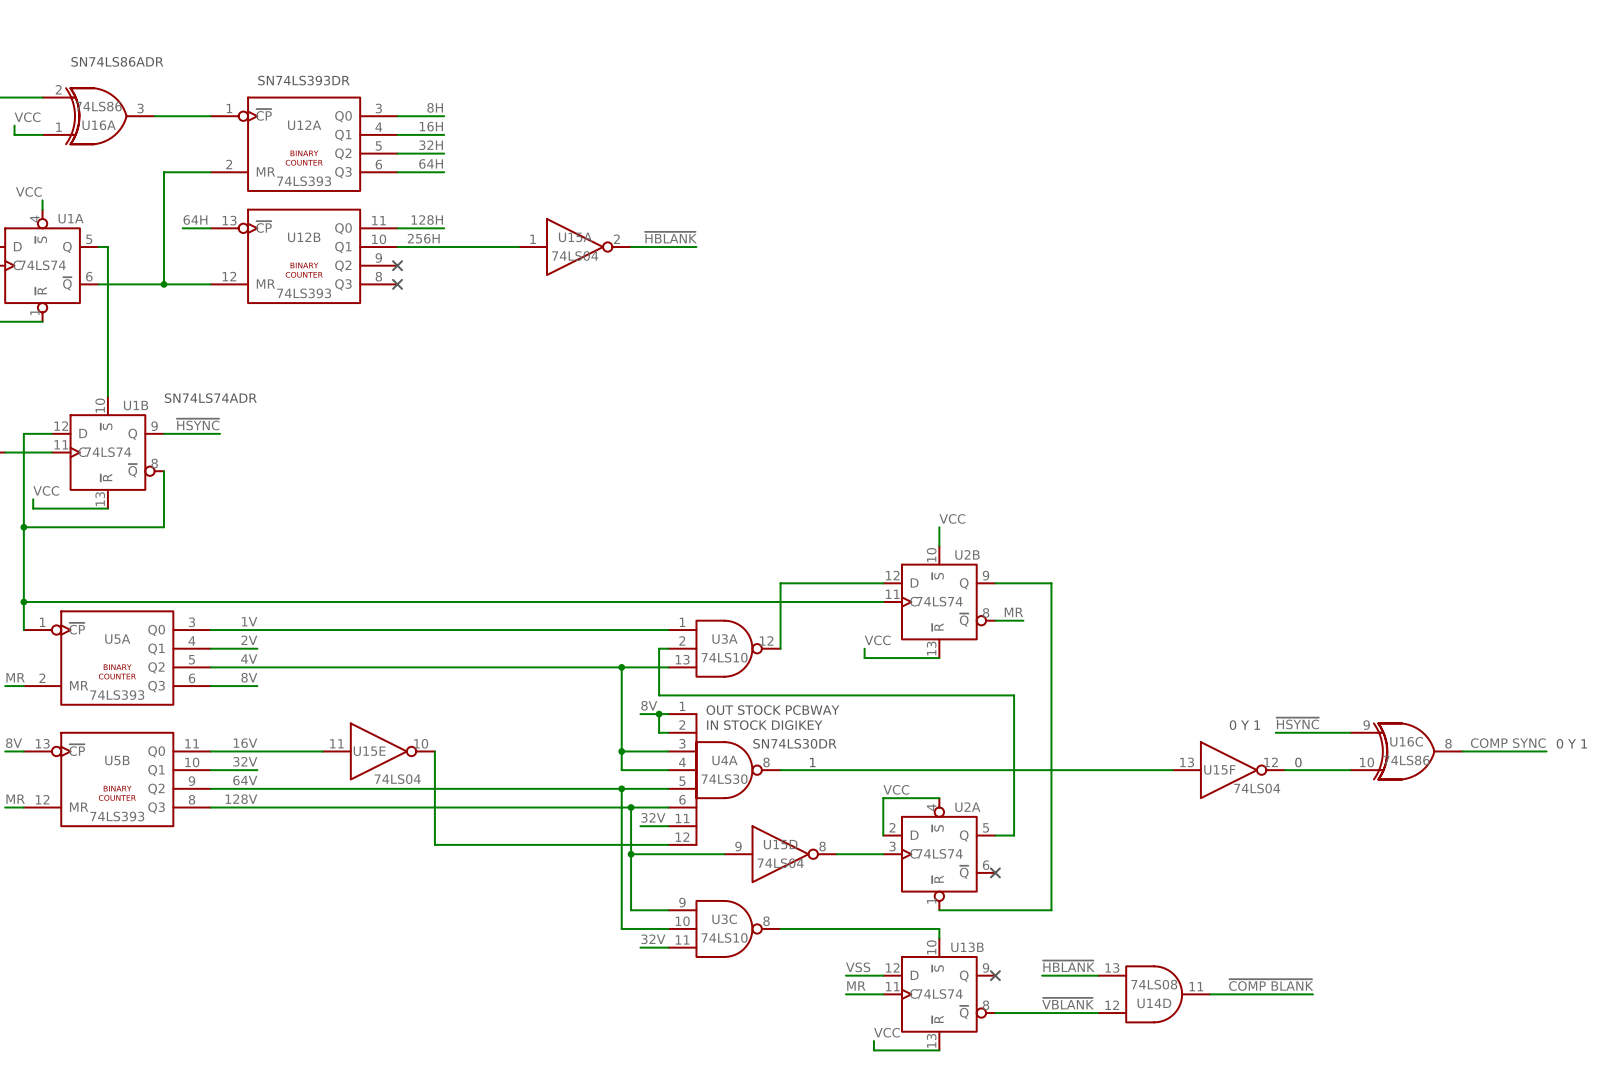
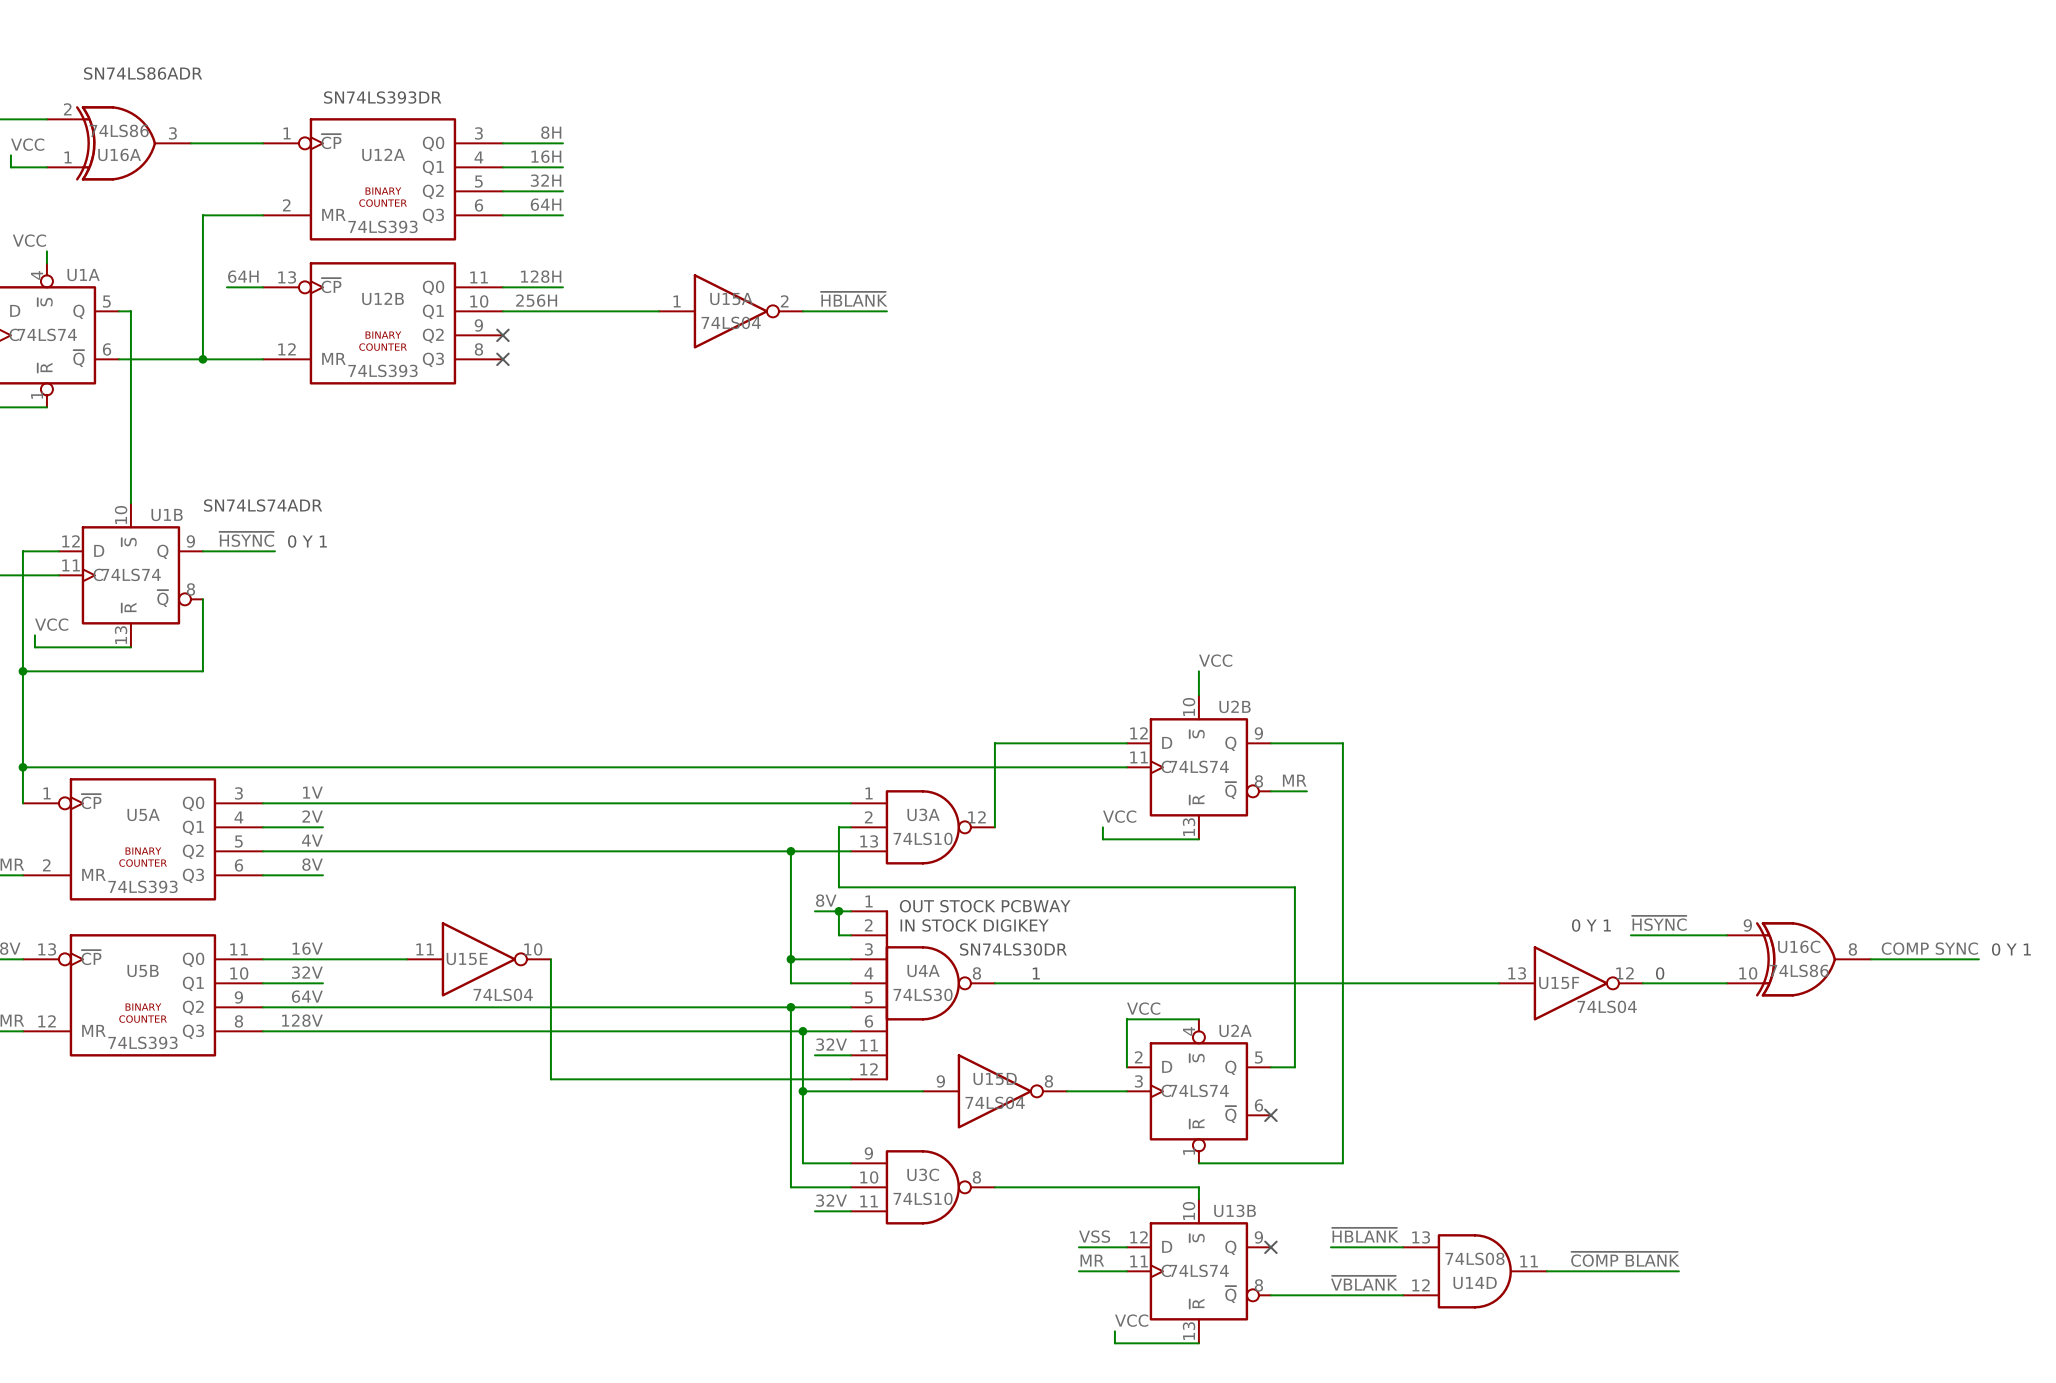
text: none -> 0 Y 1 (307, 541)

